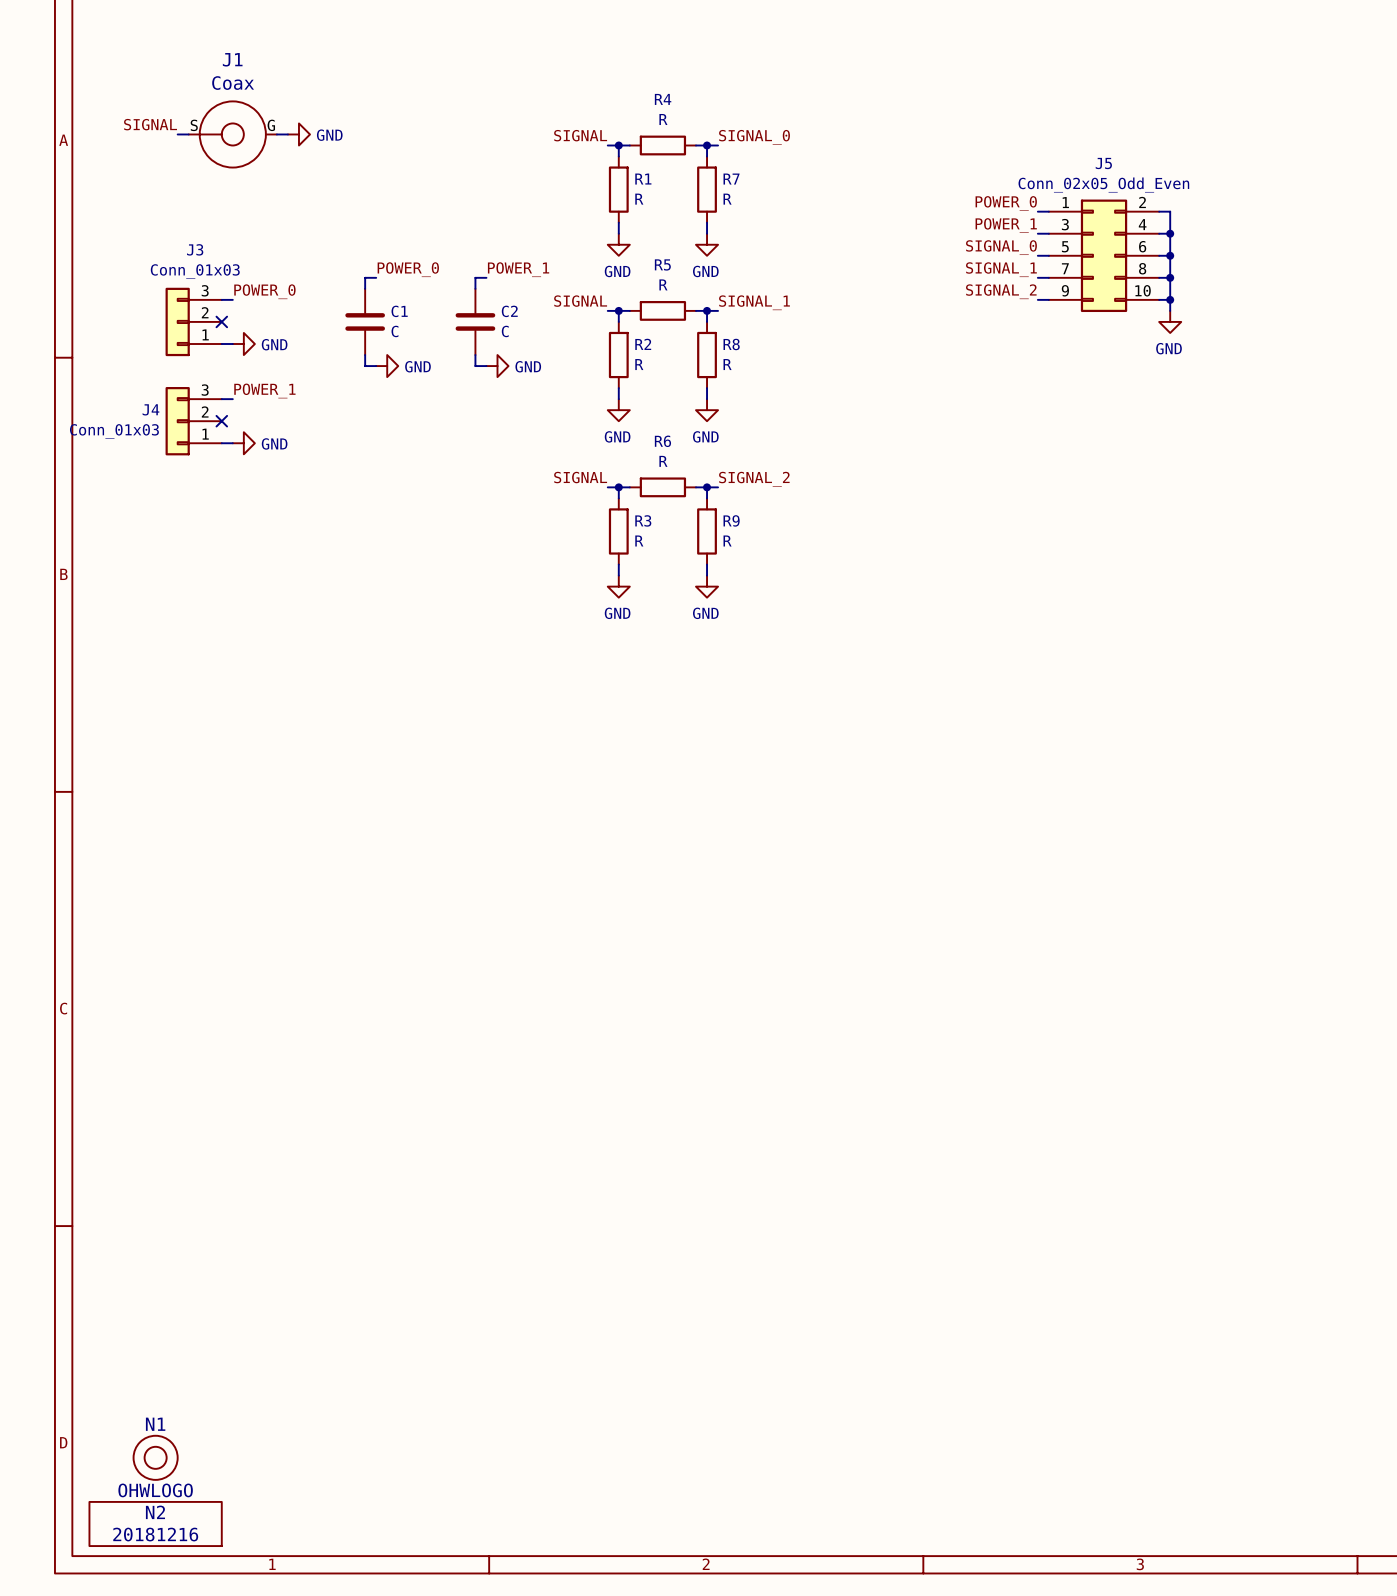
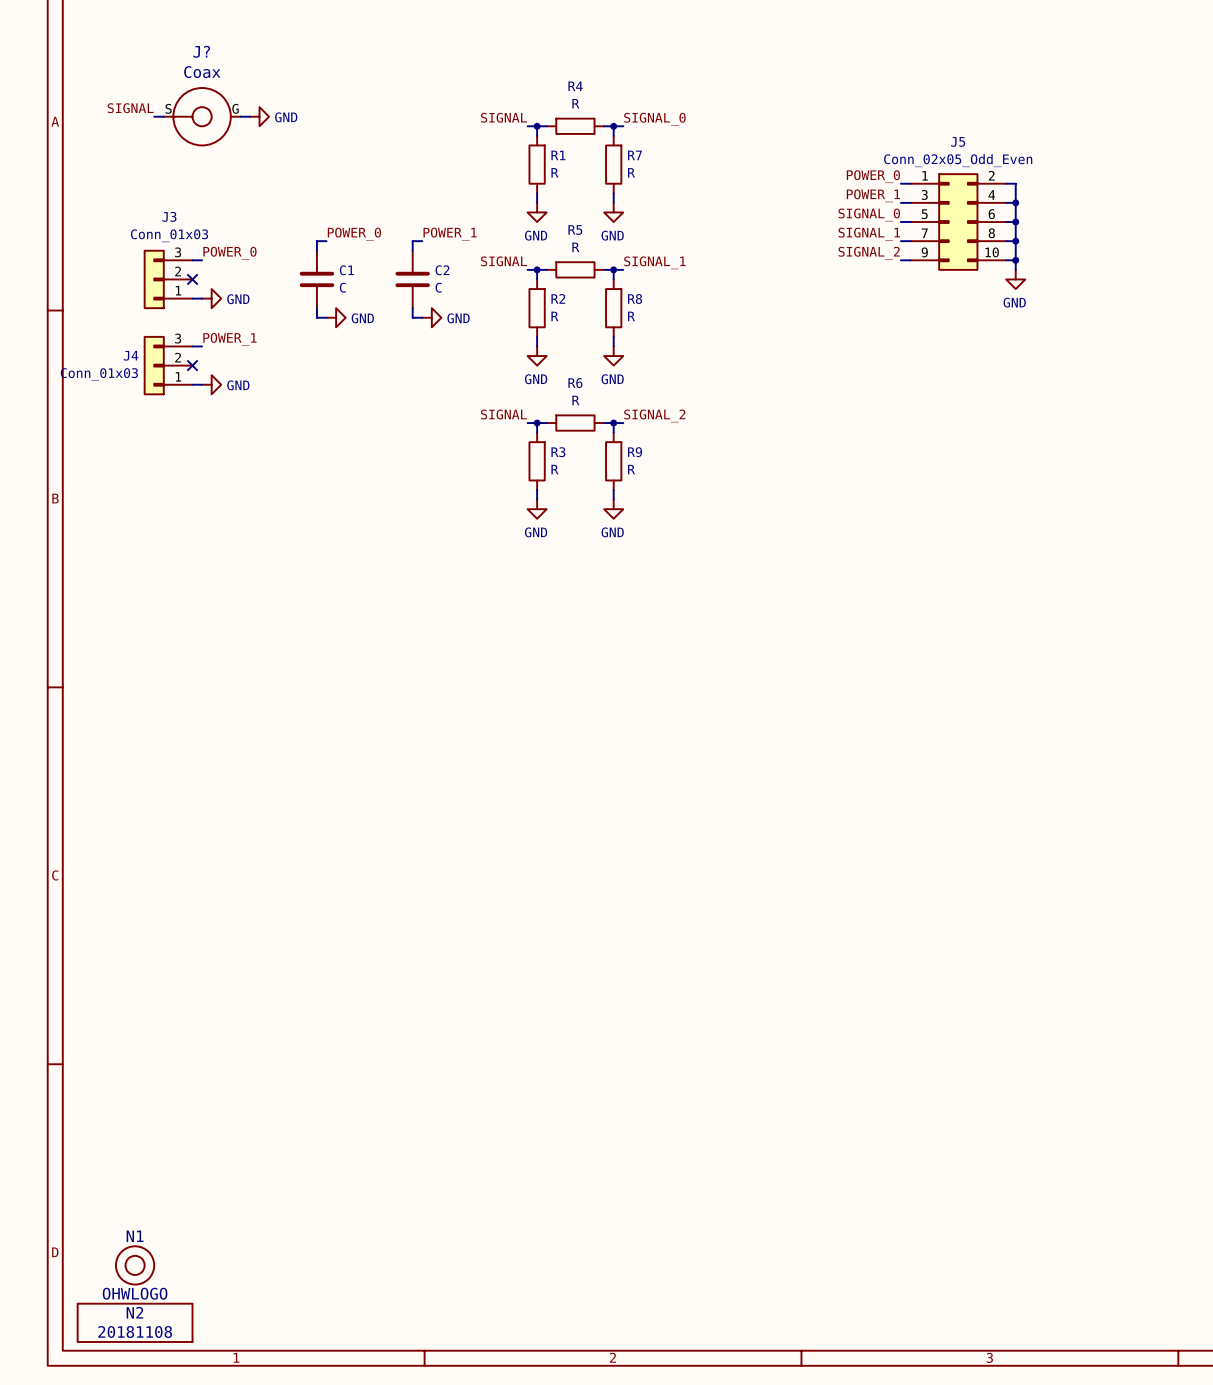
J1 name: J1 (232, 59) -> J? (201, 51)
N2 value: 20181216 (155, 1534) -> 20181108 (135, 1331)

